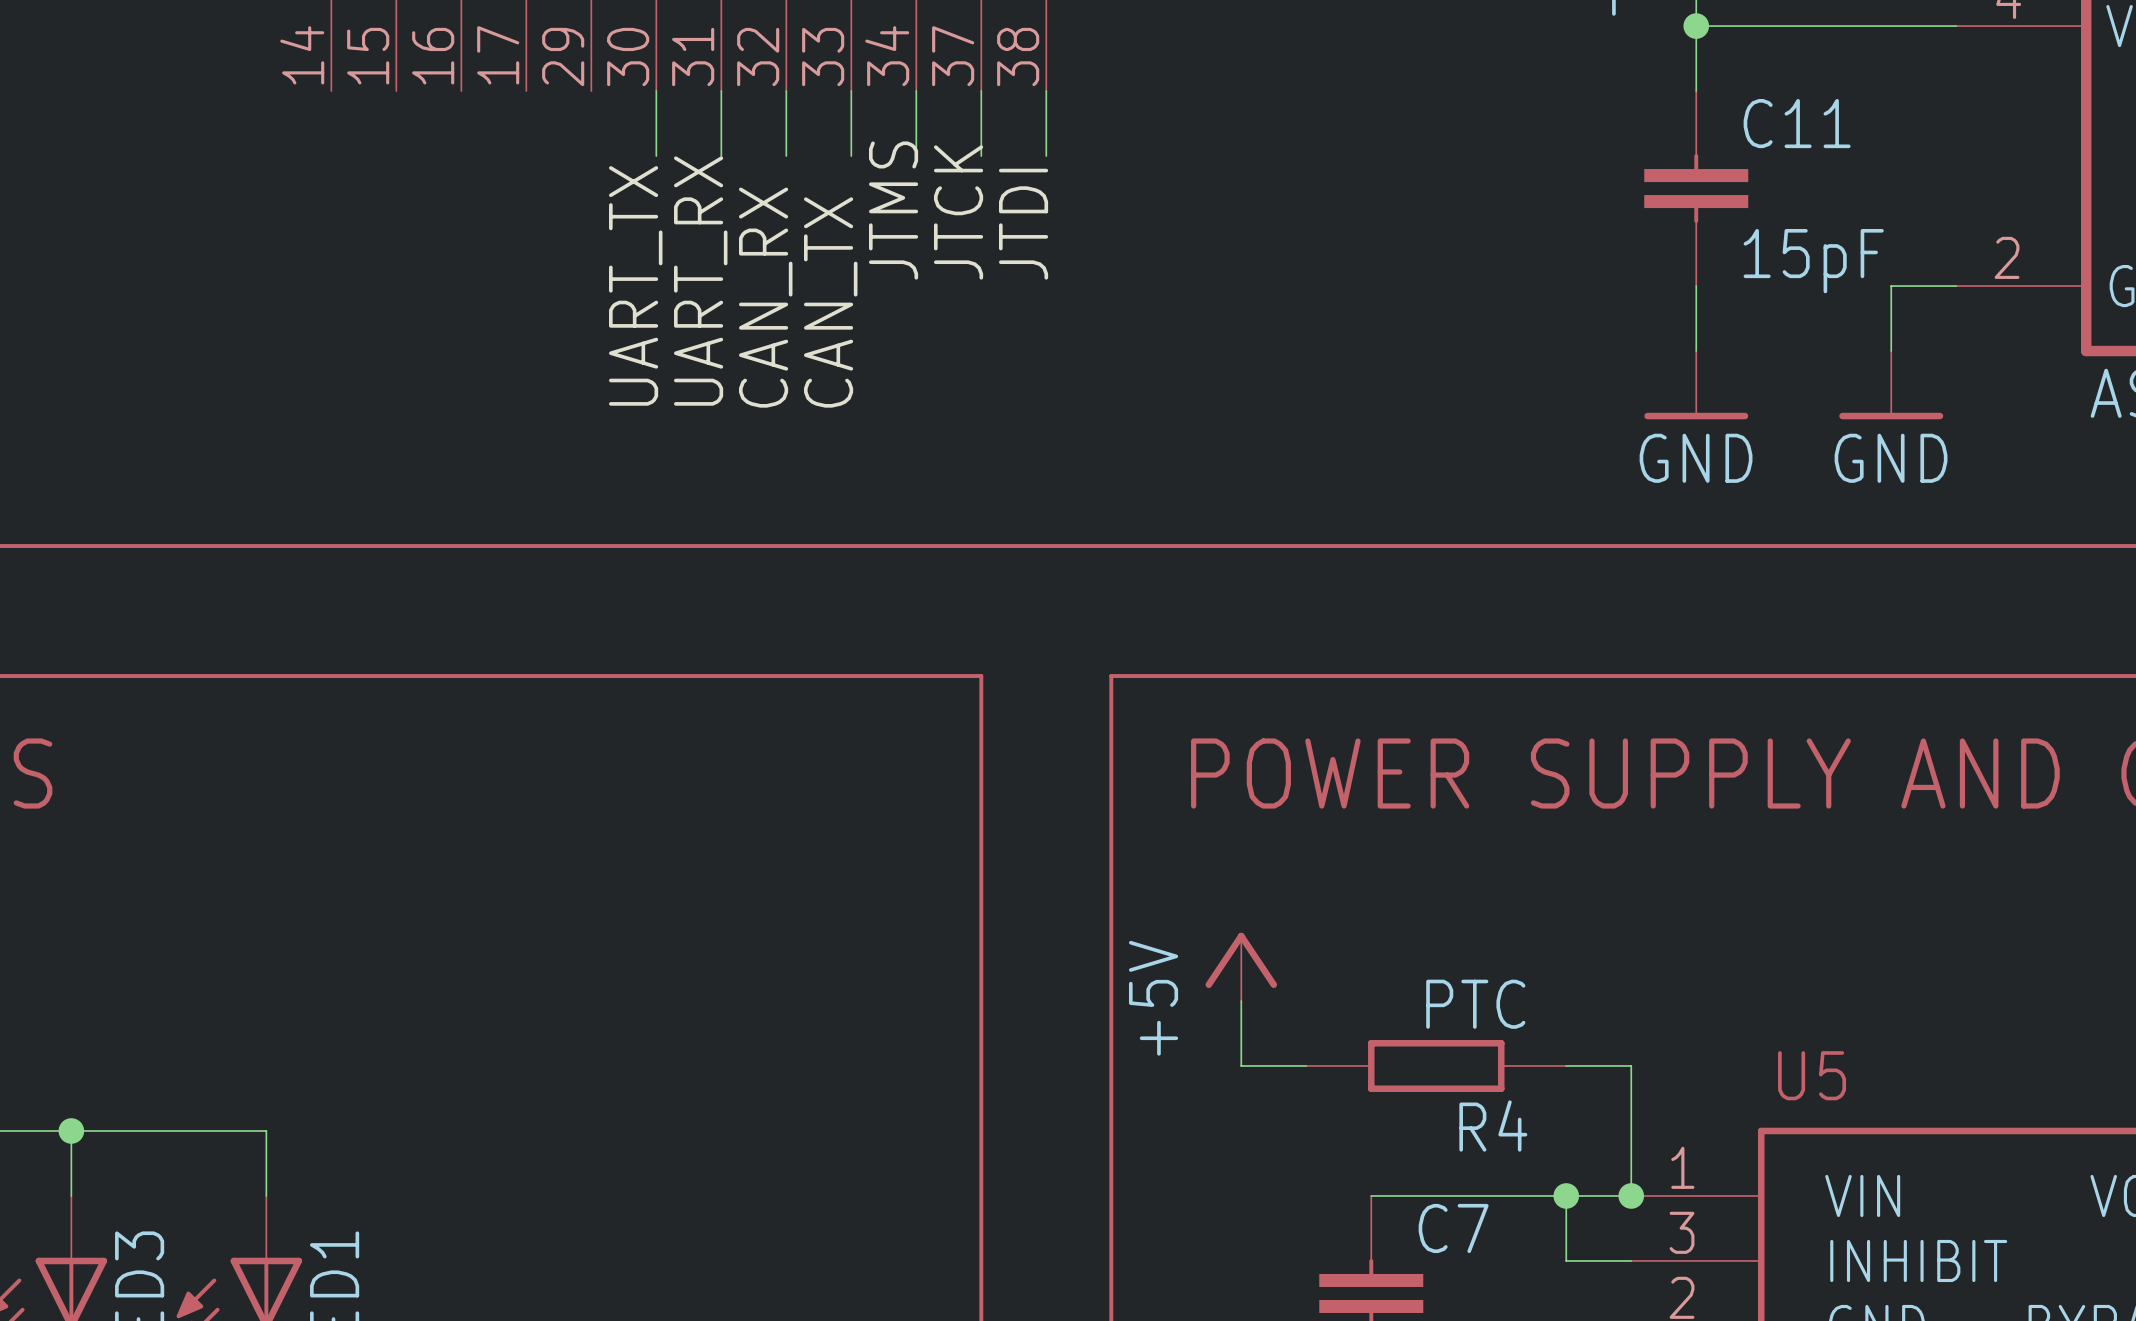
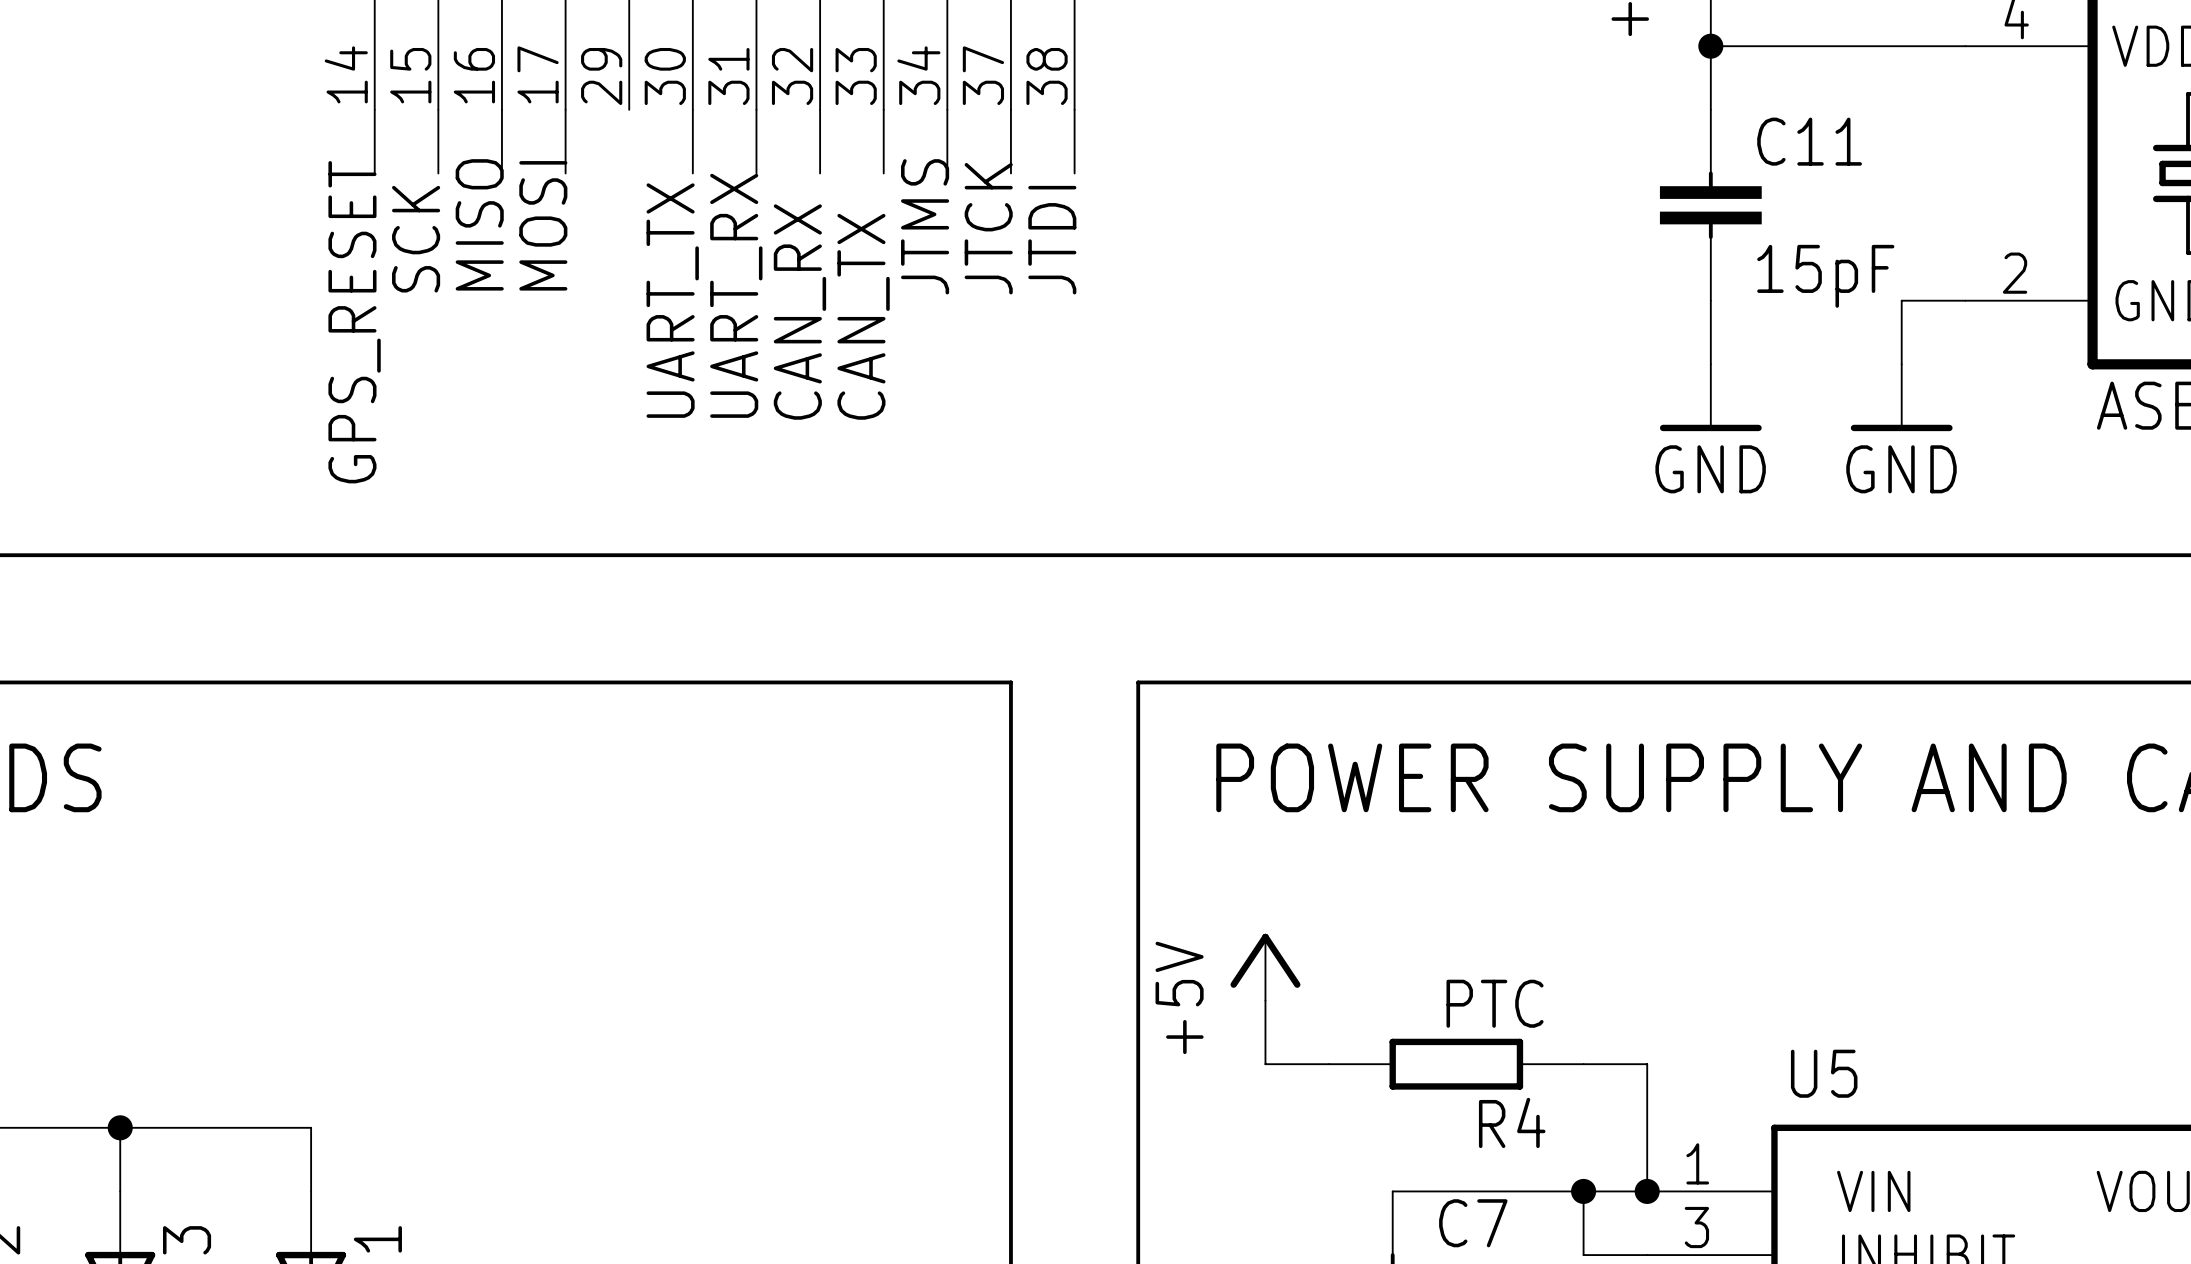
wire: none -> (374, 109) (374, 173)
wire: none -> (438, 109) (438, 173)
wire: none -> (501, 109) (501, 173)
wire: none -> (565, 109) (565, 173)
label: none -> MISO (479, 224)
label: none -> MOSI (543, 225)
label: none -> SCK (416, 239)
label: none -> GPS_RESET (354, 322)

